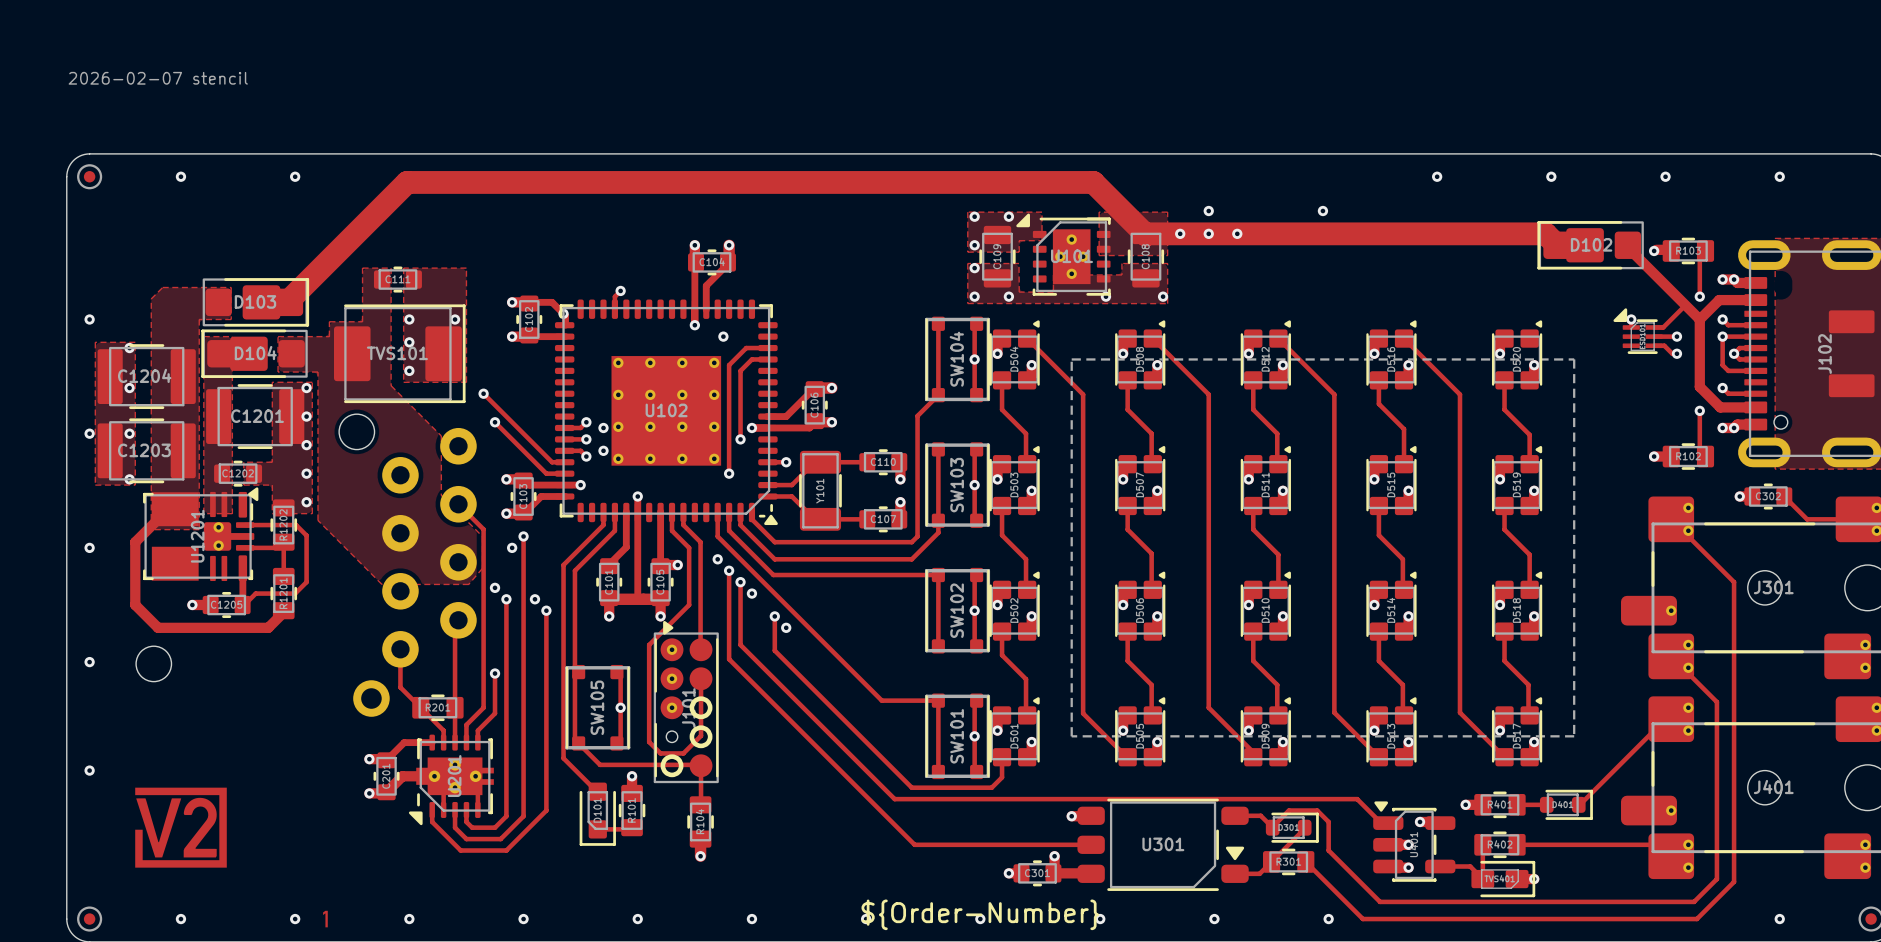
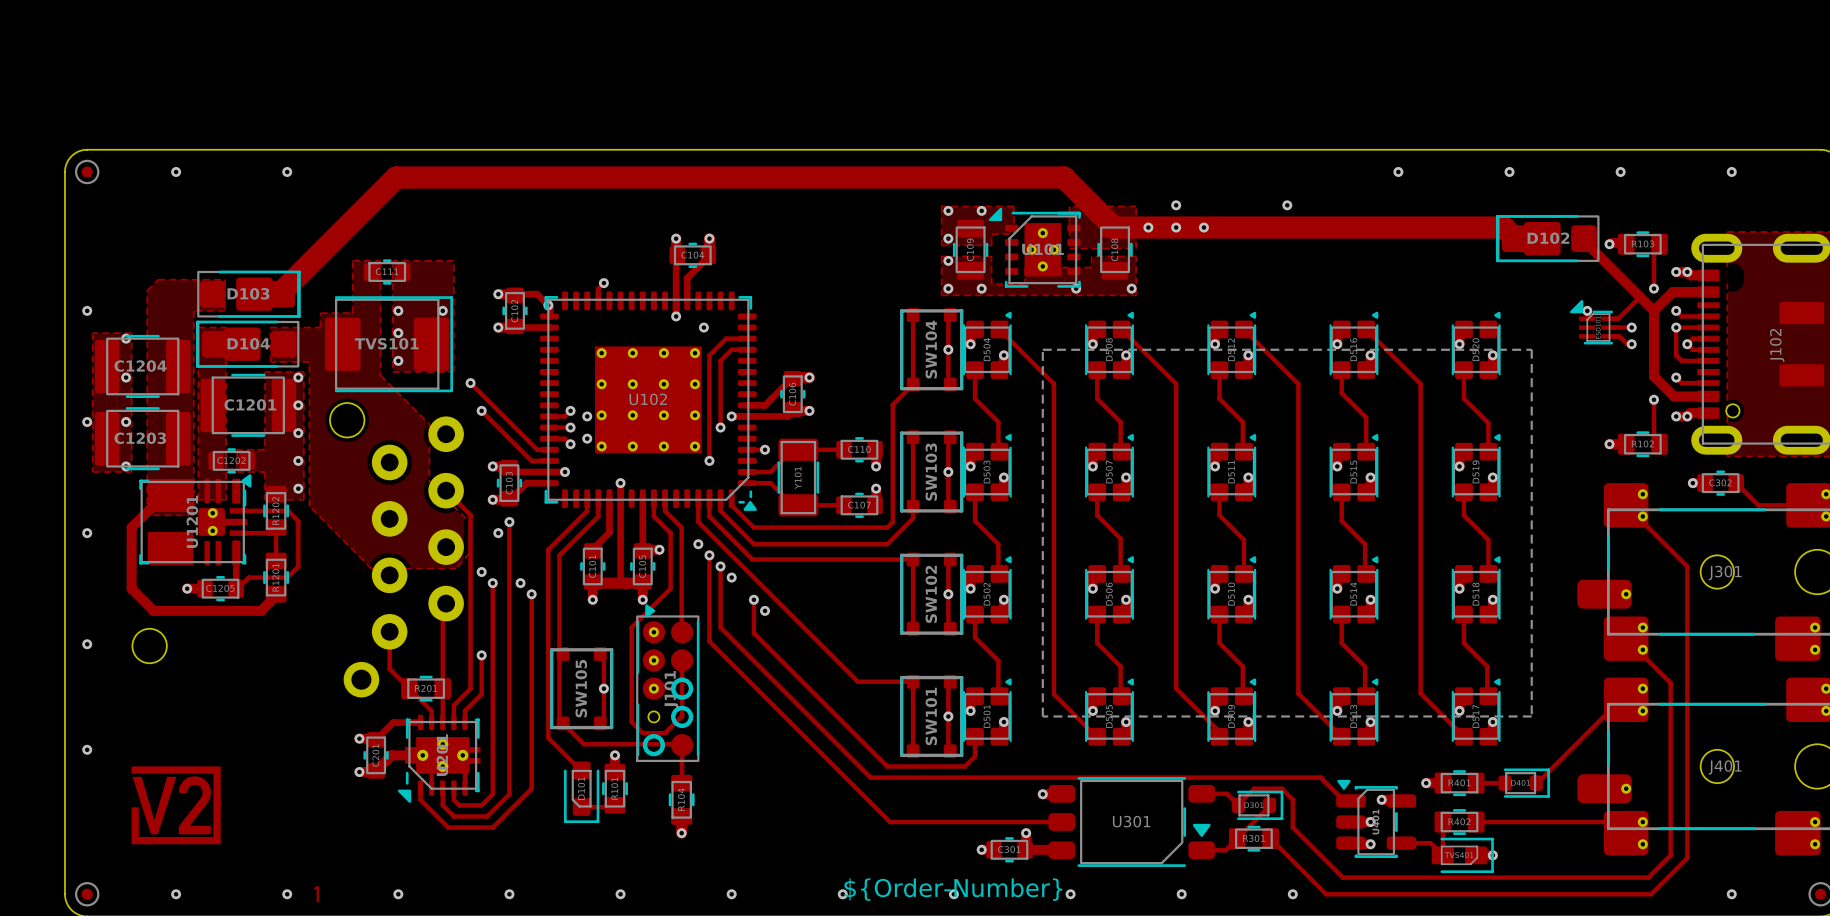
text: 2026-02-07 stencil (158, 78) -> none

